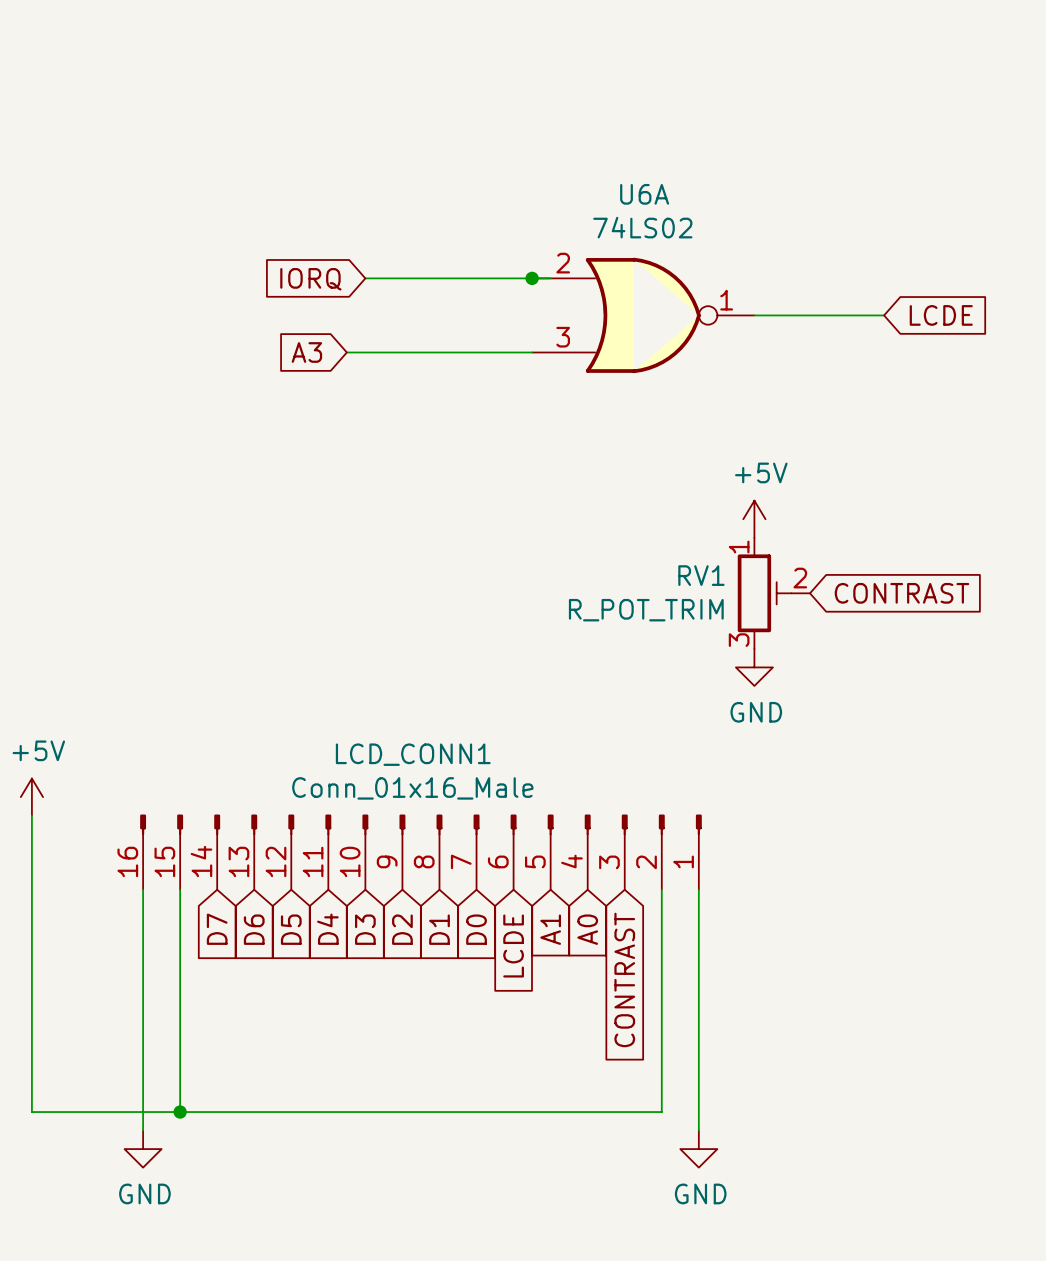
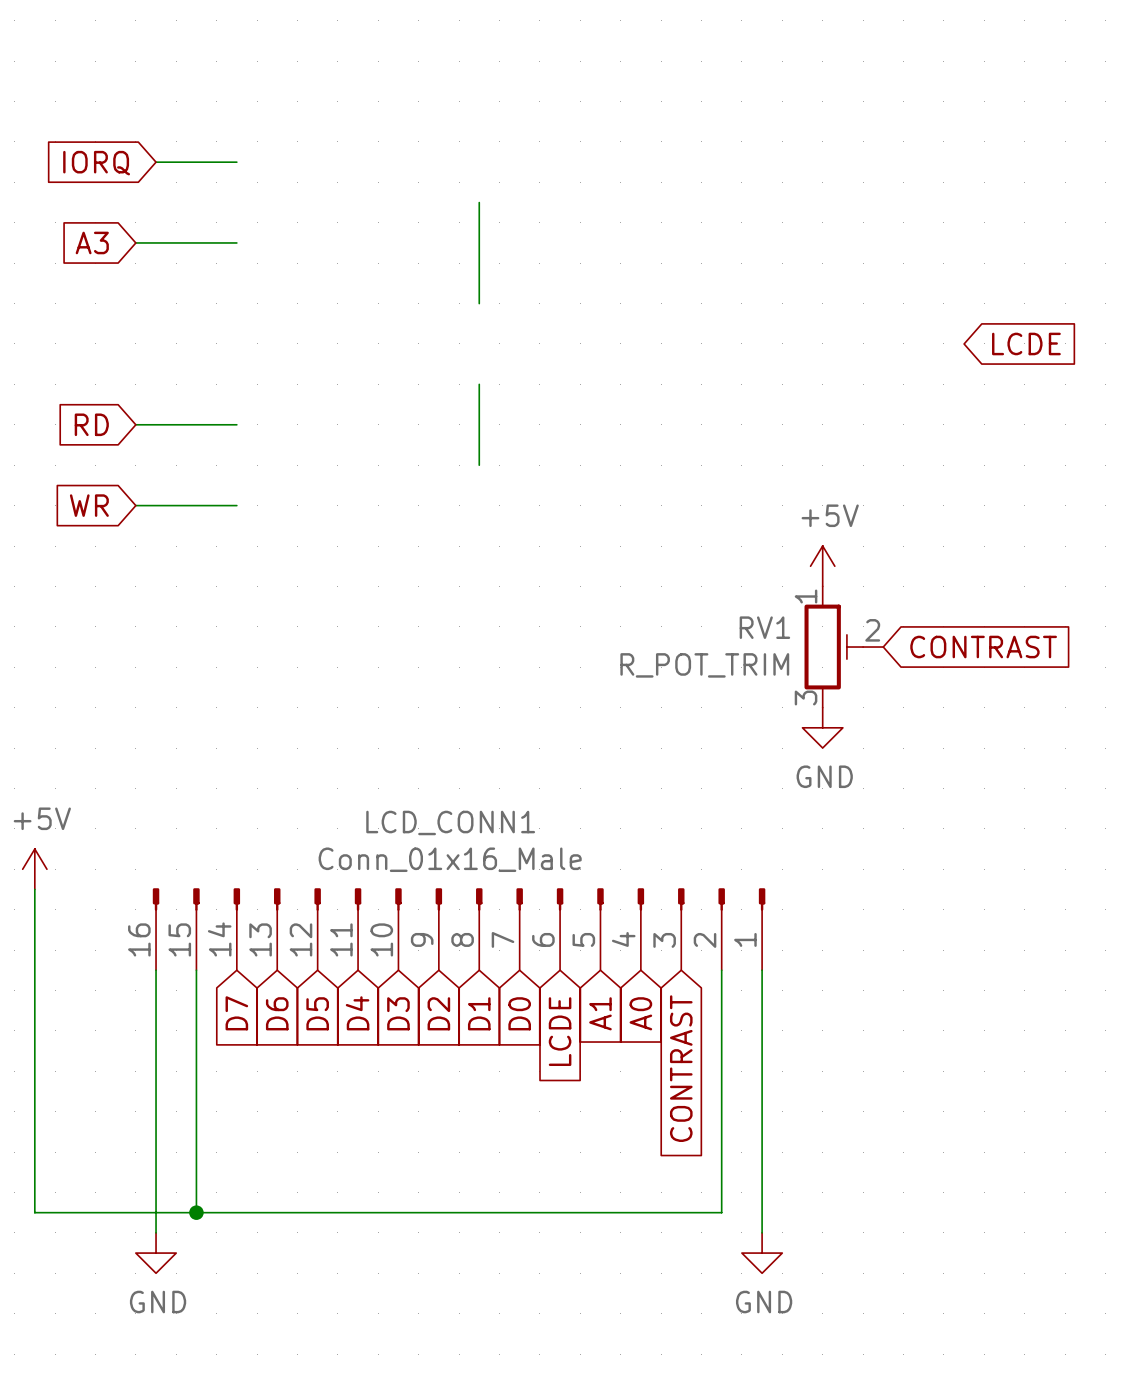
wire: none -> (156, 162) (236, 162)
wire: none -> (479, 202) (479, 303)
wire: none -> (135, 242) (236, 242)
wire: (365, 278) (550, 278) -> none
junction: (532, 278) -> none
global label position: IORQ (310, 279) -> IORQ (96, 163)
U6A: 74LS02 (643, 315) -> none
wire: (754, 315) (884, 315) -> none
global label position: A3 (306, 352) -> A3 (92, 242)
wire: (346, 352) (532, 352) -> none
wire: none -> (479, 384) (479, 465)
global label: none -> RD (91, 424)
wire: none -> (135, 424) (236, 424)
global label: none -> WR (89, 505)
wire: none -> (135, 505) (236, 505)

